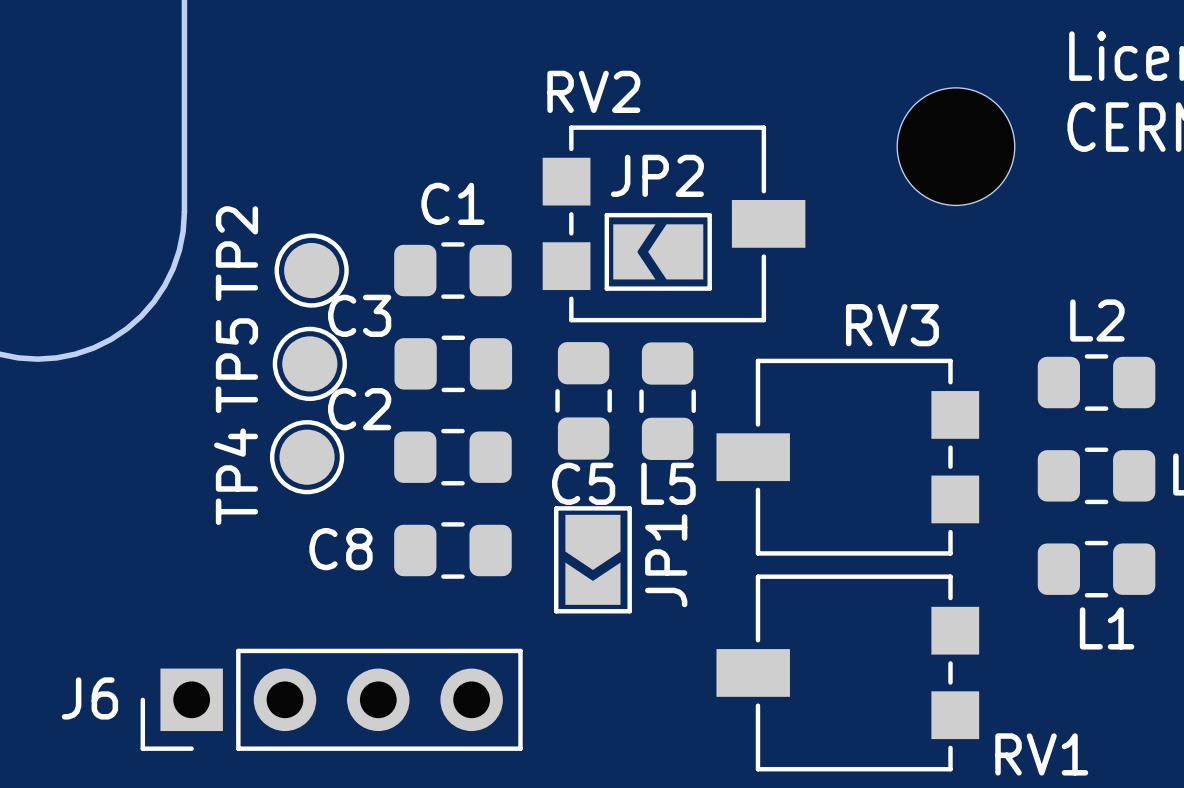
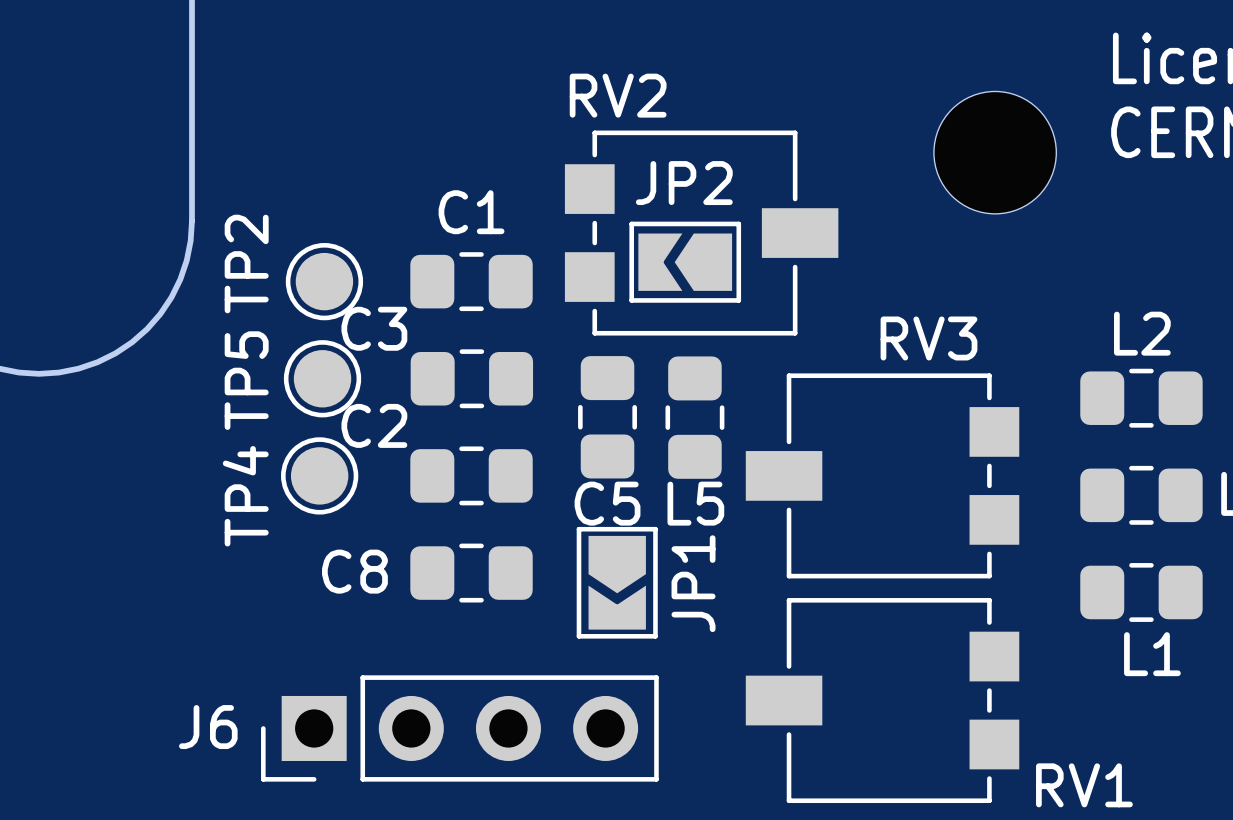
J6 position: (331, 699) -> (459, 728)

